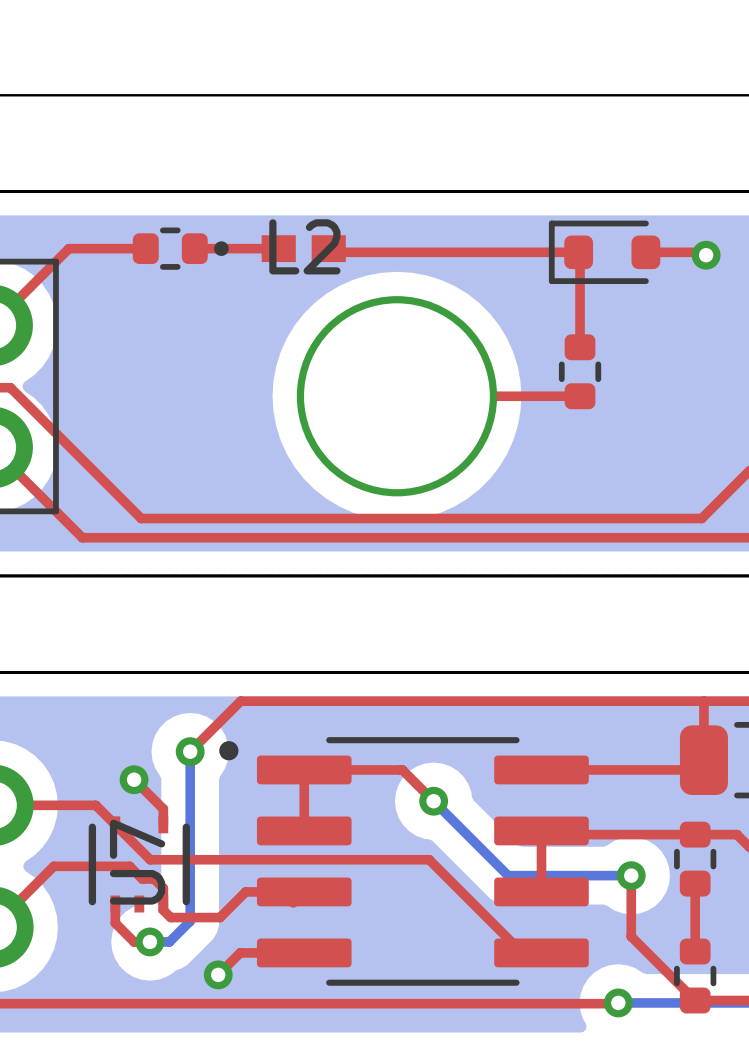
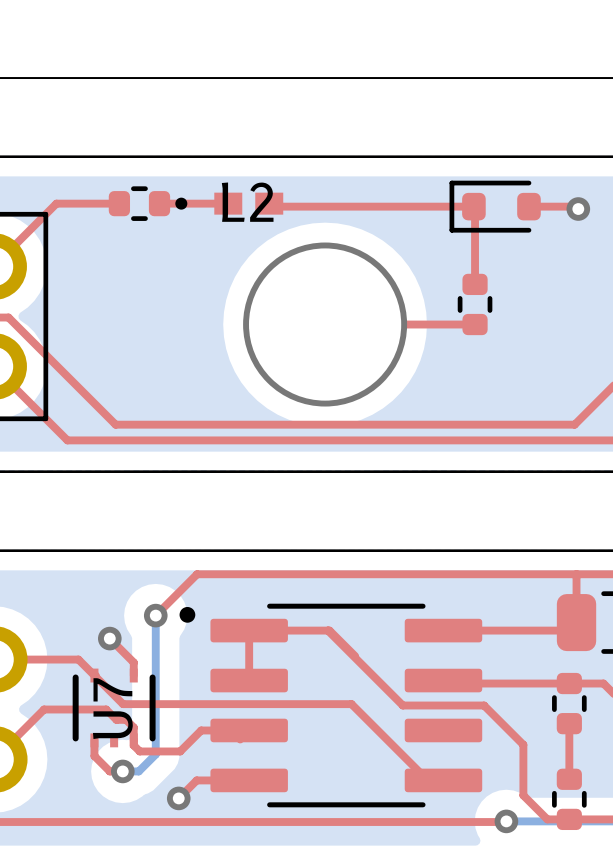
bottom track: (433, 801) (508, 875) (631, 875) -> none
via: (433, 801) -> none
top track: (541, 830) (541, 891) -> none
top track: (631, 875) (631, 936) (695, 1000) -> (327, 630) (402, 705) (484, 705) (523, 744) (523, 795) (547, 819) (569, 819)
via: (631, 875) -> none

